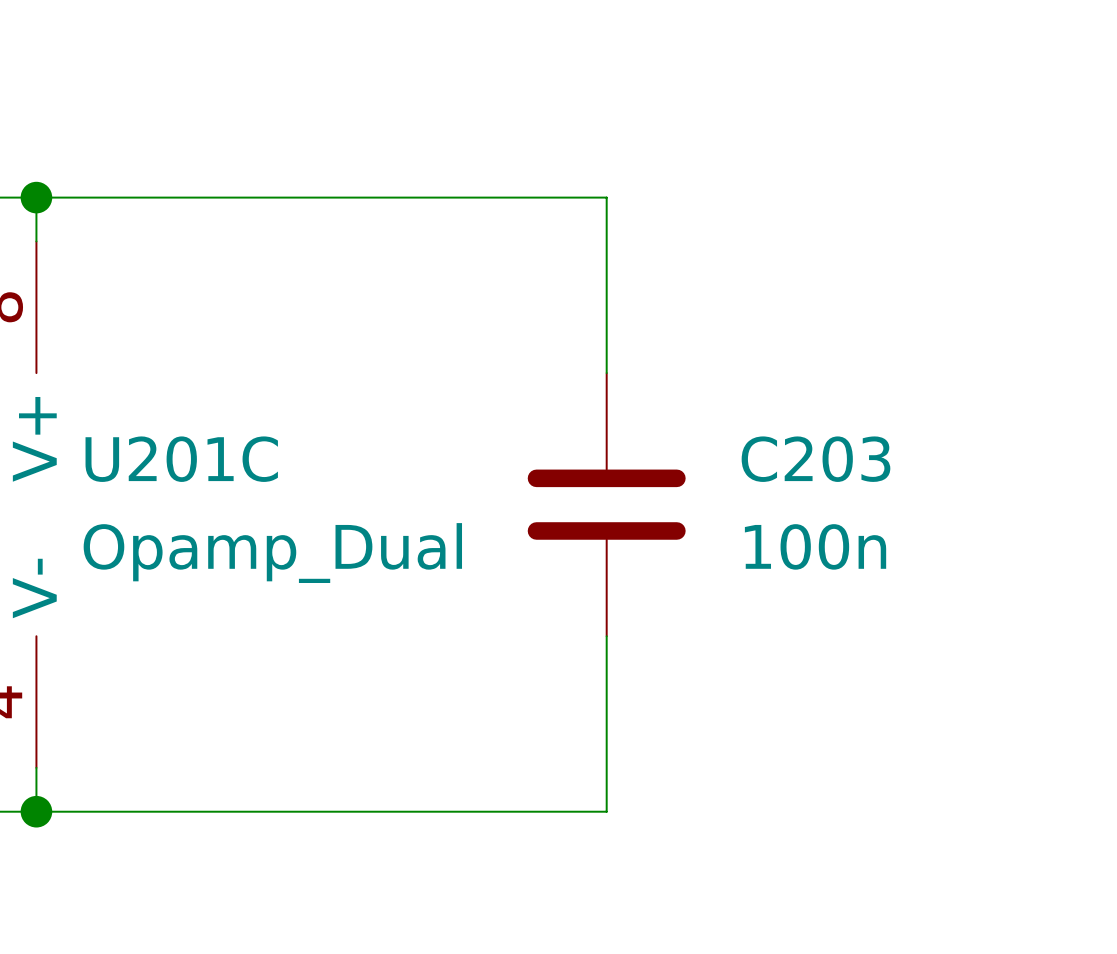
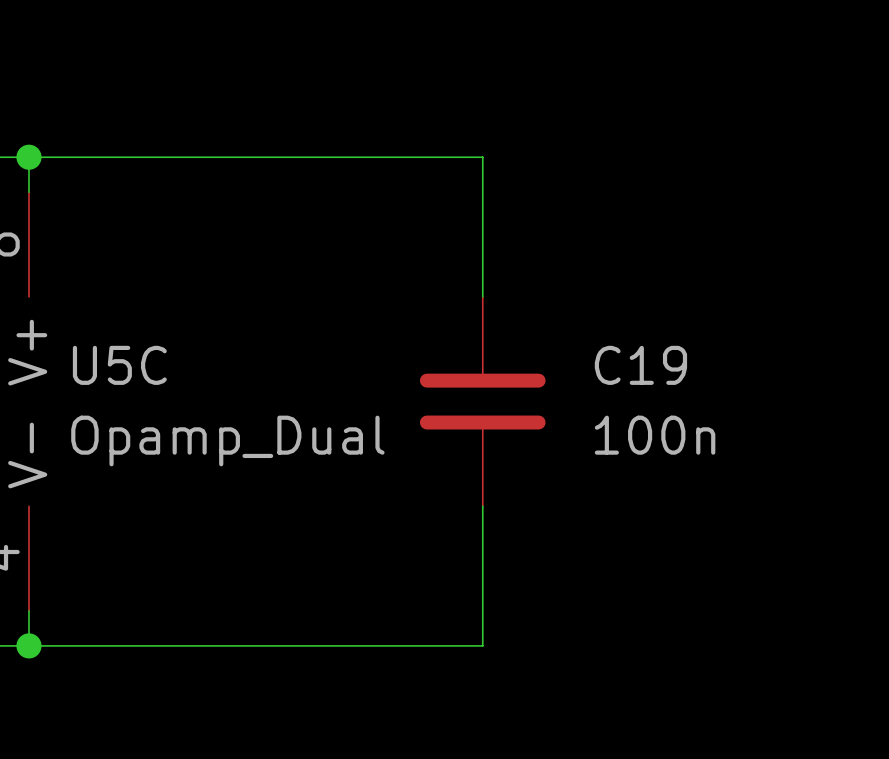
U201C name: U201C (181, 459) -> U5C (119, 365)
C203 name: C203 (815, 459) -> C19 (640, 365)

